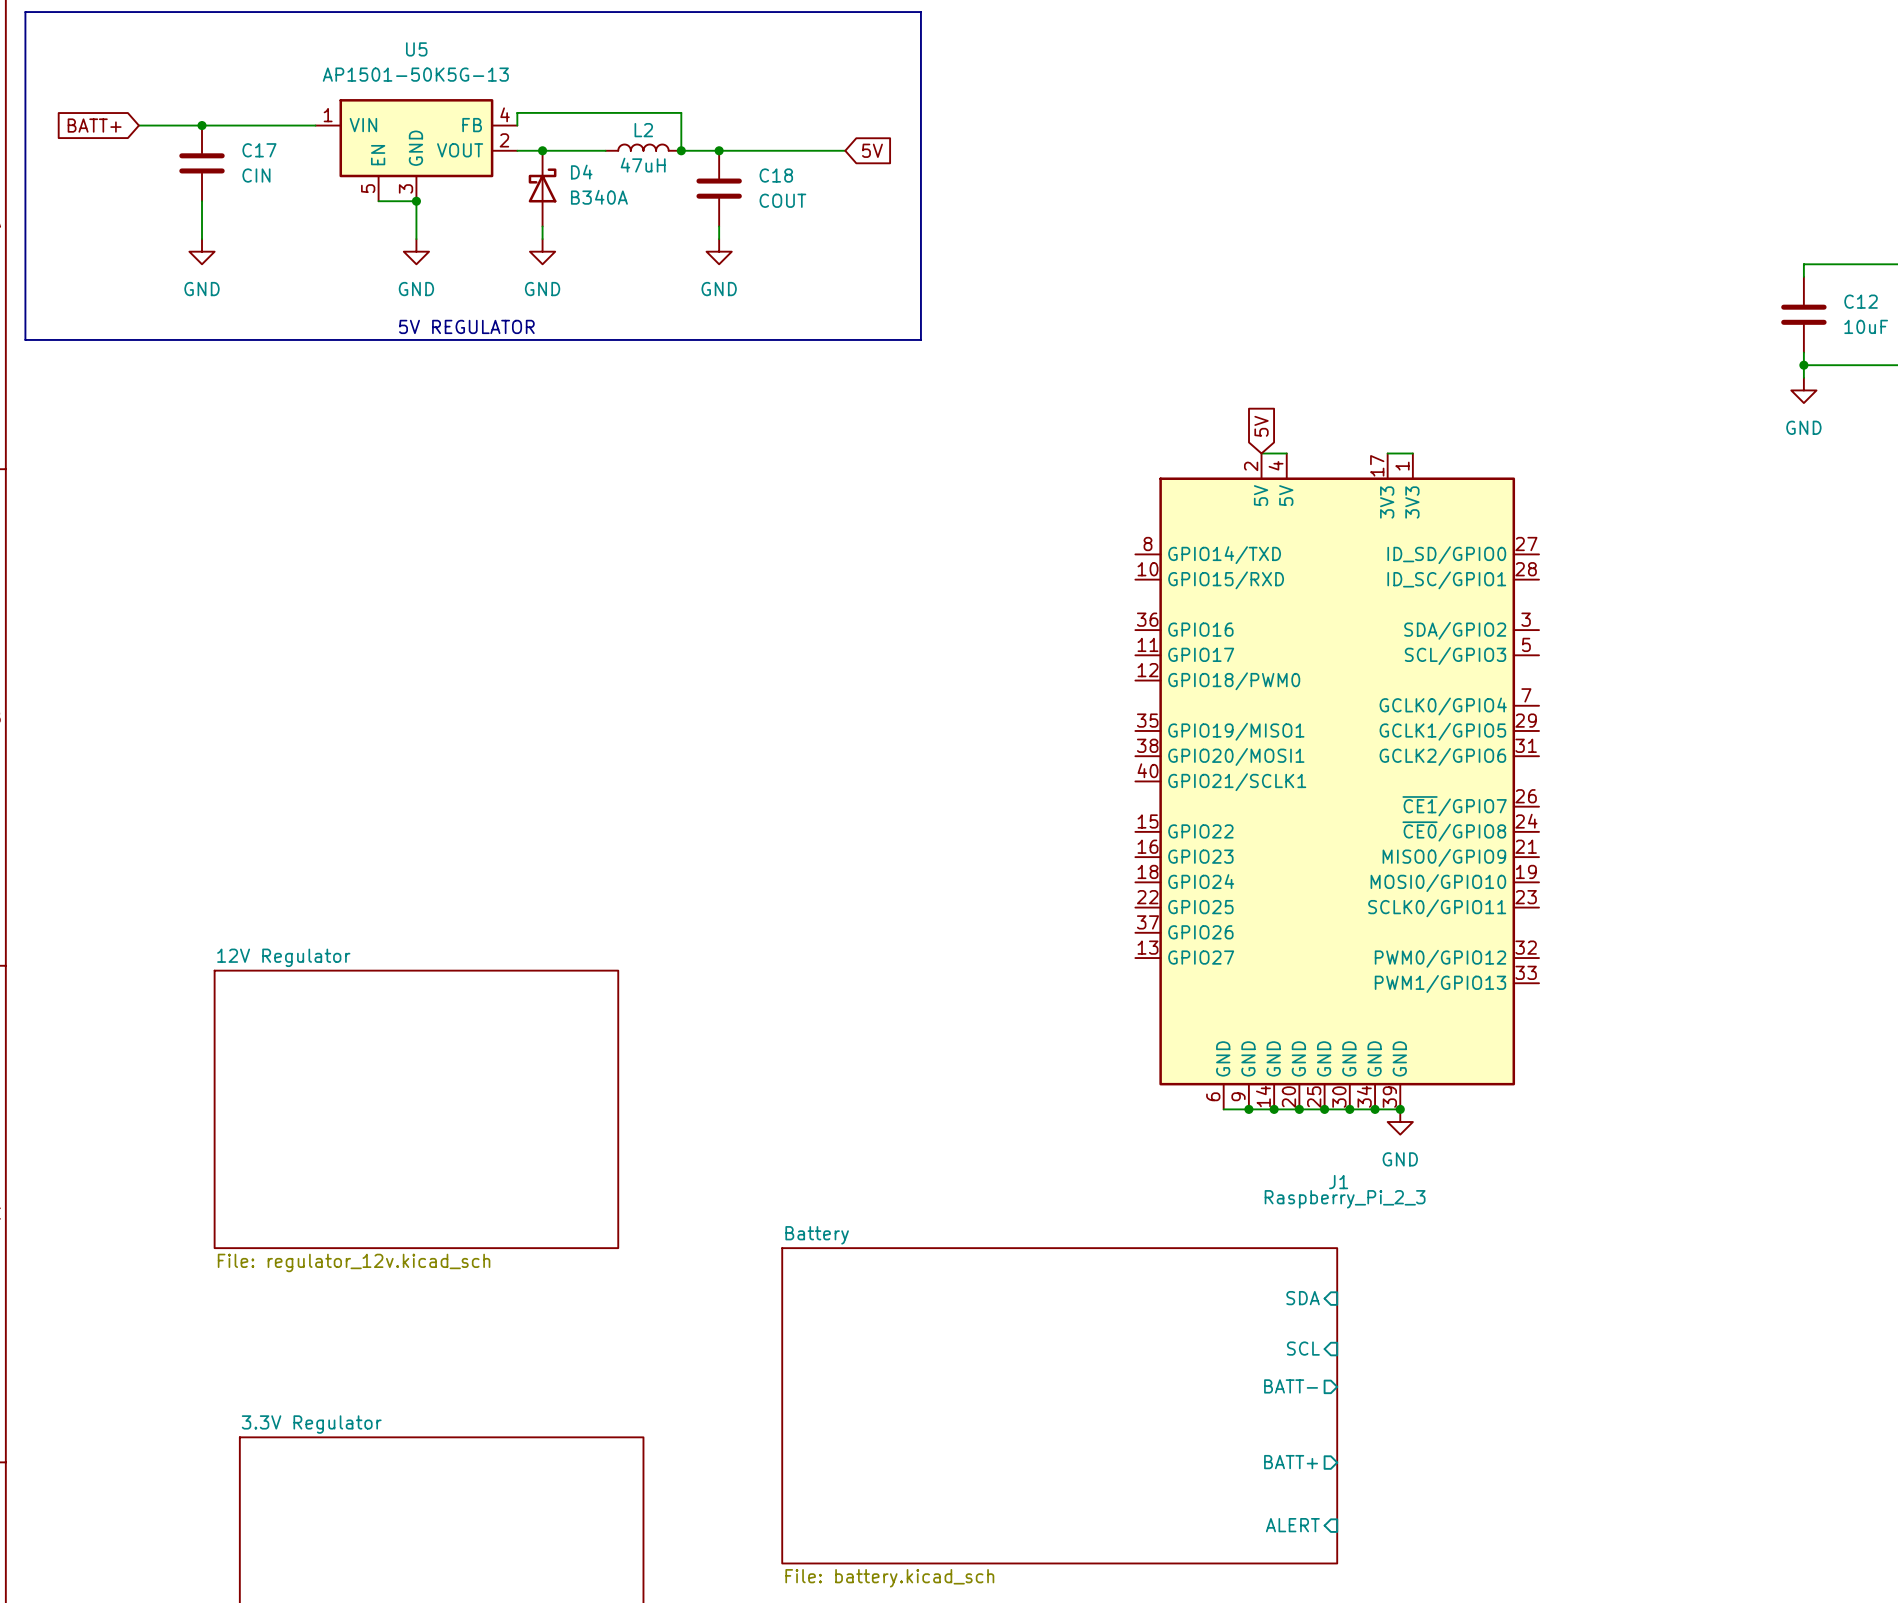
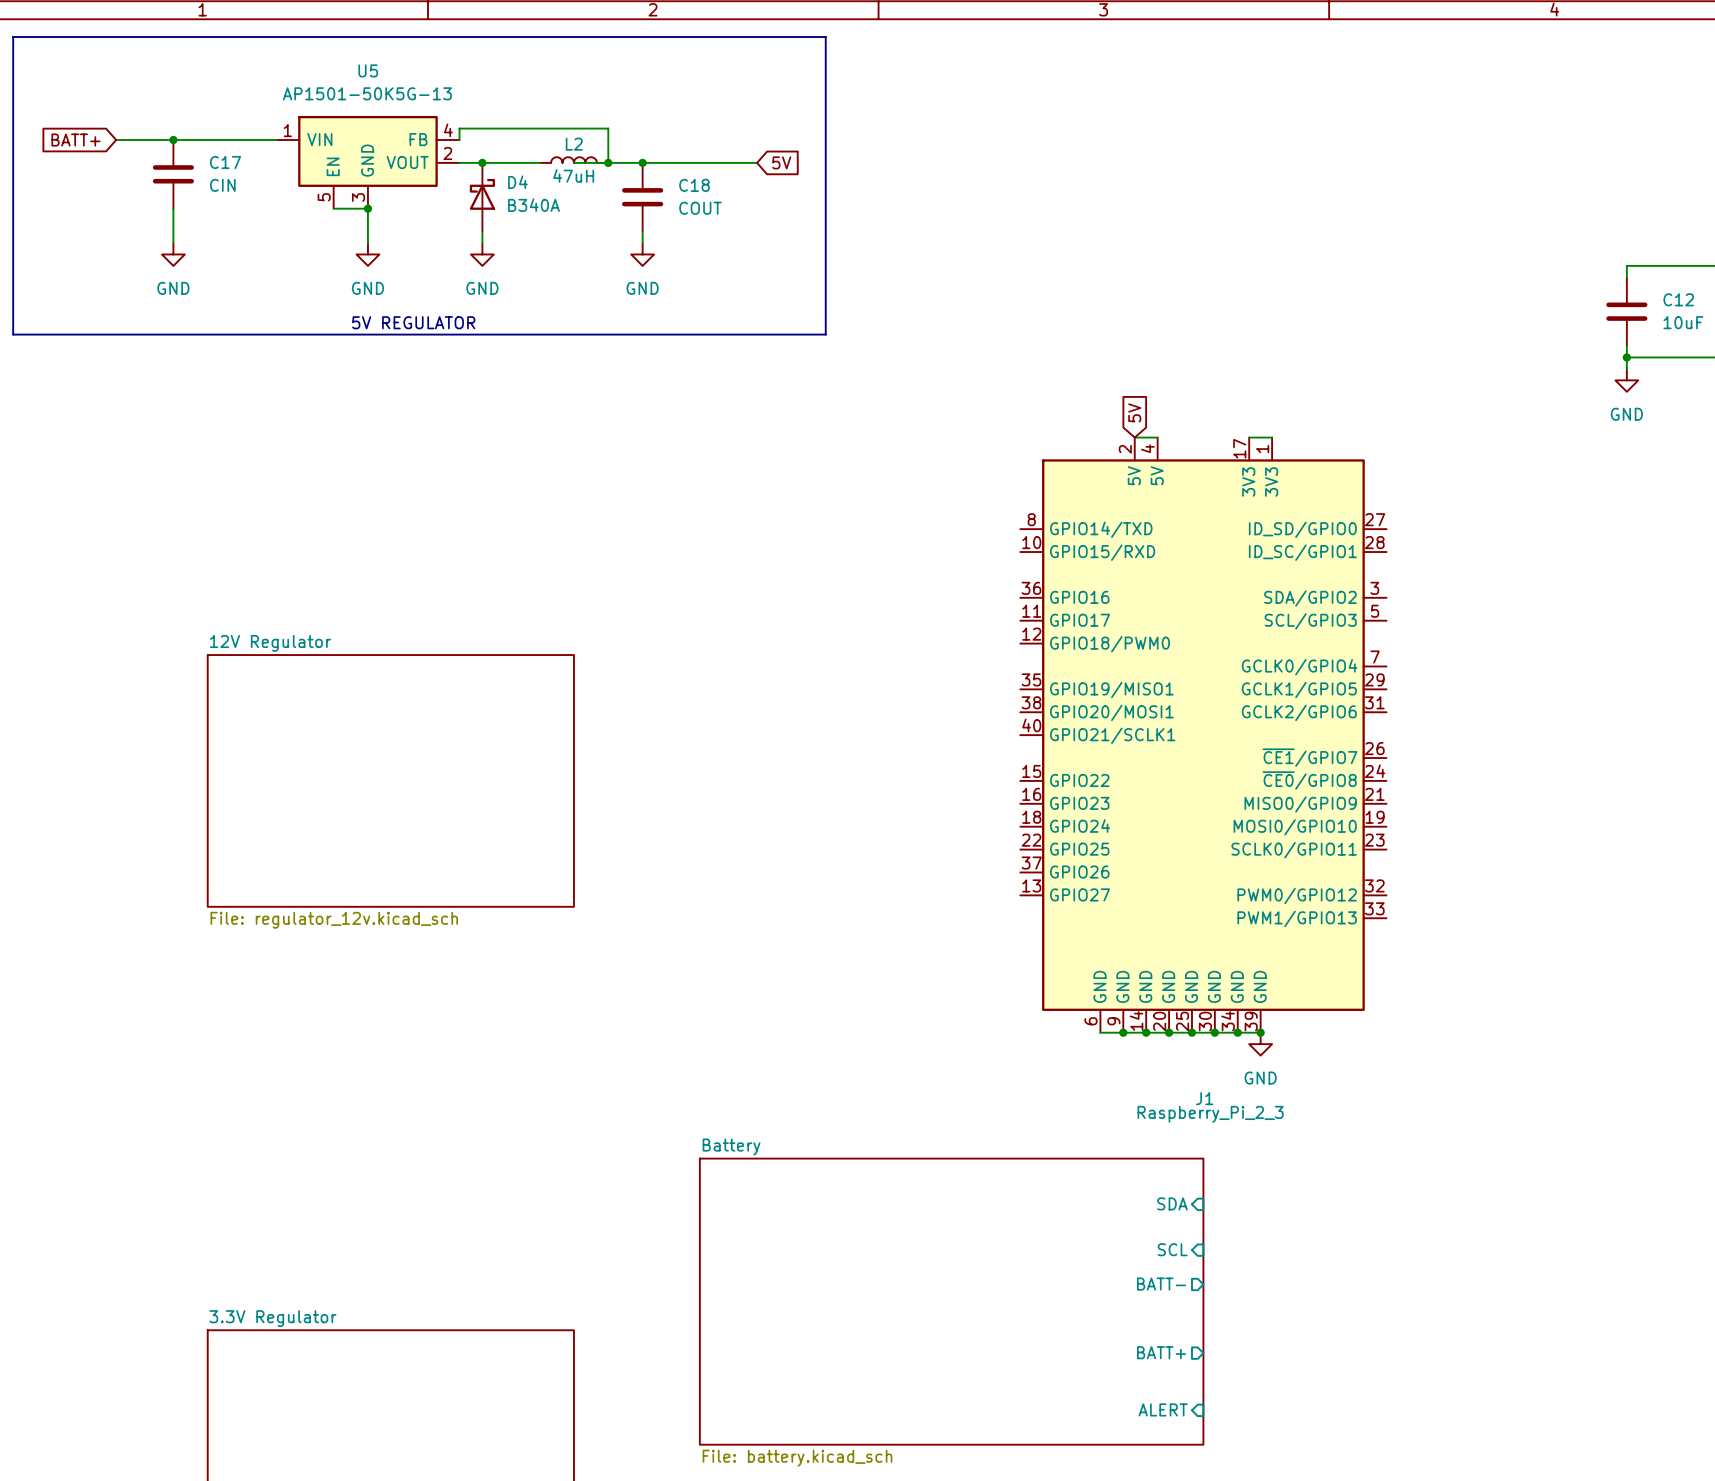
wire: none -> (573, 162) (608, 162)
sheet 12V Regulator position: (416, 1109) -> (390, 780)

